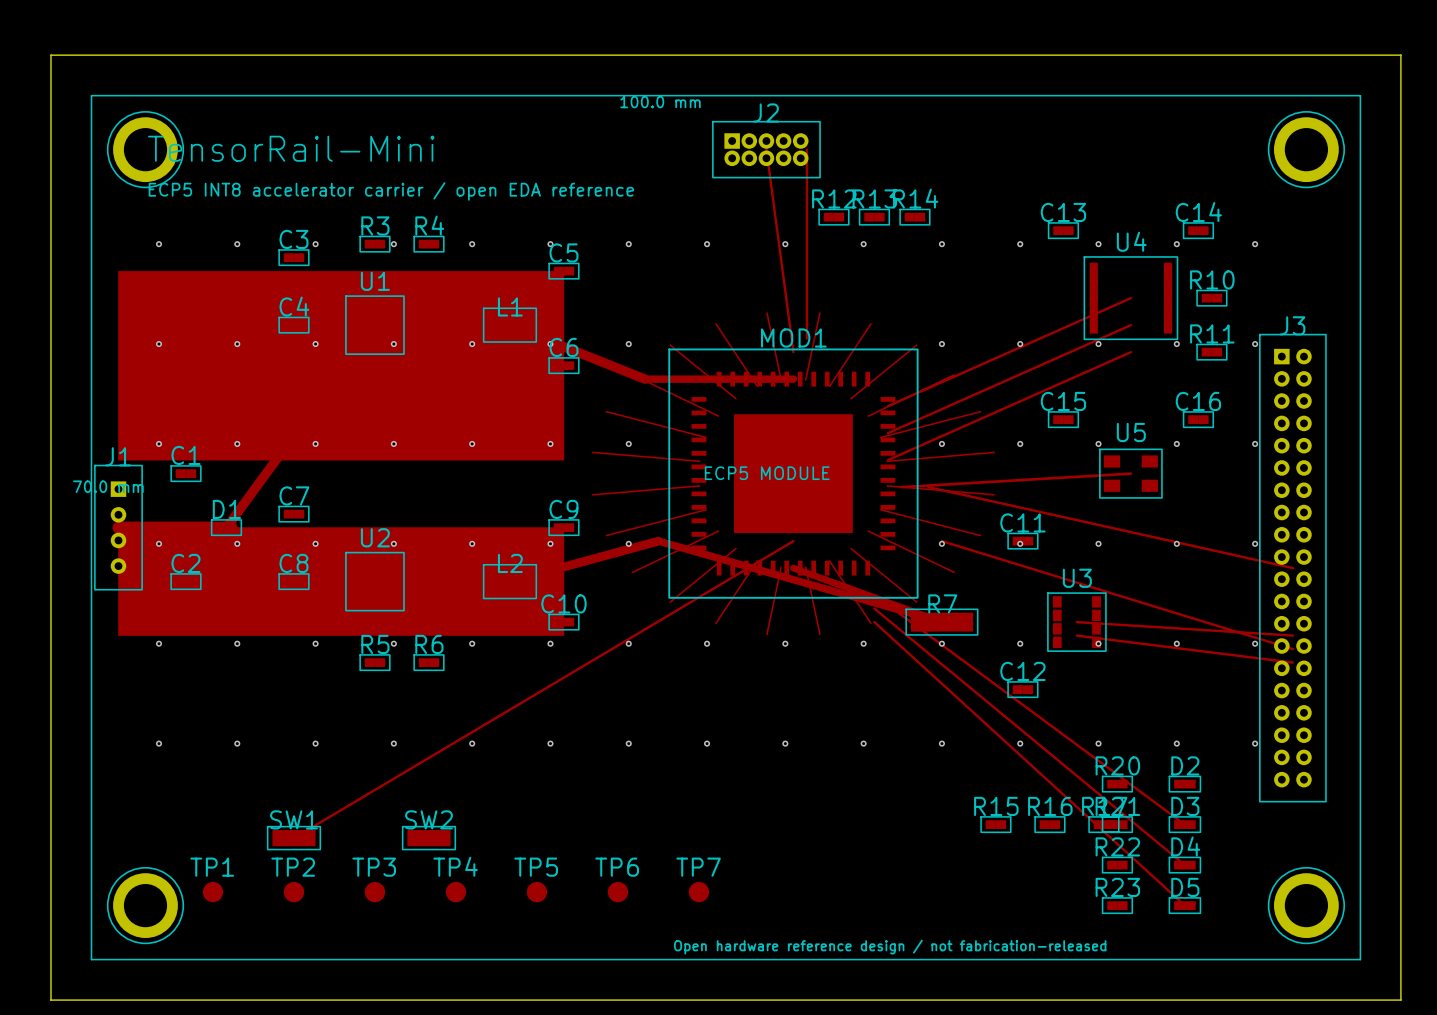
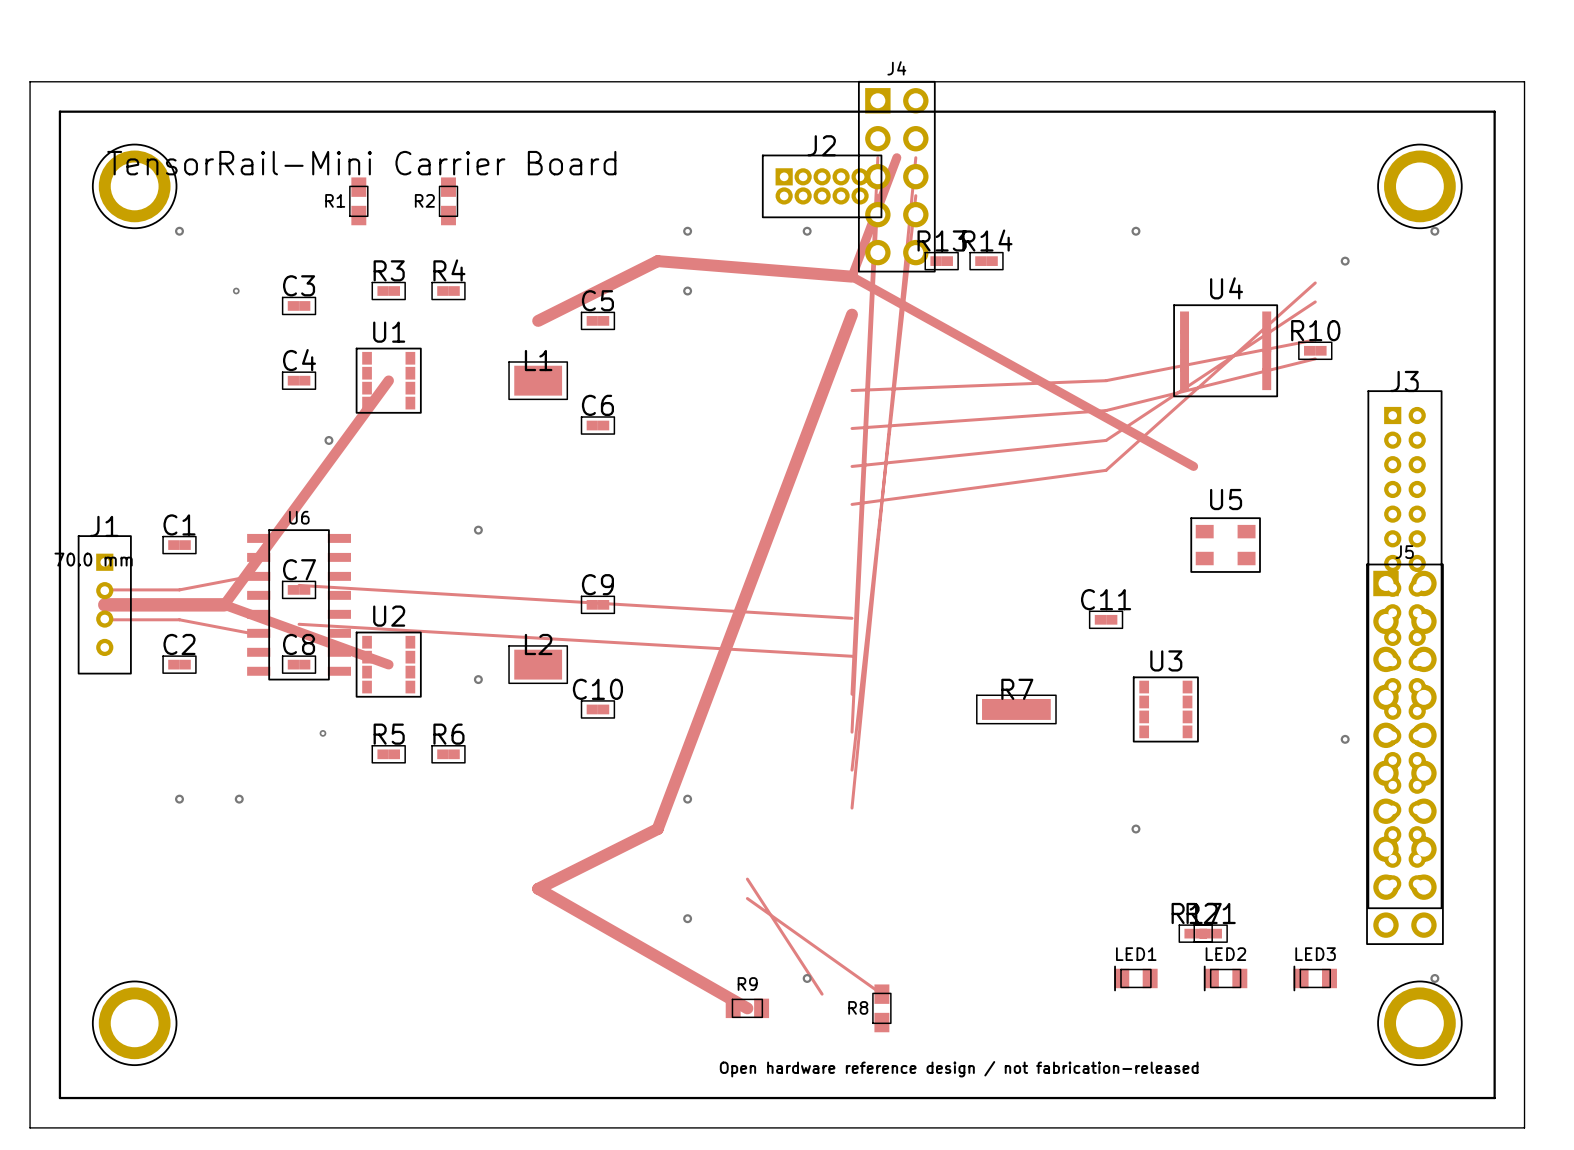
line: (91, 95) (1360, 95) (1360, 959) (91, 959) (91, 95) -> (59, 111) (59, 1098) (1494, 1098) (1494, 111) (59, 111)
text: 100.0 mm (660, 102) -> none
track: none -> (877, 157) (852, 694)
track: none -> (896, 157) (852, 276)
track: none -> (915, 157) (852, 808)
J4: none -> (896, 176)
text: TensorRail-Mini (291, 148) -> TensorRail-Mini Carrier Board (361, 163)
track: (766, 149) (793, 352) -> none
track: (806, 149) (806, 338) -> none
track: none -> (877, 195) (852, 732)
track: none -> (915, 195) (852, 770)
R1: none -> (358, 201)
R2: none -> (448, 201)
via: none -> (179, 231)
via: none -> (687, 231)
via: none -> (807, 231)
via: none -> (1135, 231)
via: none -> (1434, 231)
text: ECP5 INT8 accelerator carrier / open EDA reference (391, 191) -> none
R12: (833, 217) -> none
via: none -> (1345, 261)
C13: (1063, 230) -> none
C14: (1198, 230) -> none
track: none -> (852, 276) (657, 261) (538, 320)
track: none -> (852, 276) (1193, 466)
track: none -> (1315, 282) (1106, 470) (852, 504)
via: (158, 244) -> none
via: (315, 244) -> none
via: (393, 244) -> none
via: (472, 244) -> none
via: (550, 244) -> none
via: (628, 244) -> none
via: none -> (687, 291)
via: (707, 244) -> none
via: (785, 244) -> none
via: (863, 244) -> none
via: (941, 244) -> none
via: (1020, 244) -> none
via: (1098, 244) -> none
via: (1176, 244) -> none
via: (1255, 244) -> none
track: none -> (1315, 301) (1106, 440) (852, 466)
track: none -> (852, 314) (657, 829) (538, 888) (747, 1008)
drawing: [118, 270, 565, 461] -> none
track: none -> (1315, 339) (1106, 380) (852, 390)
track: (1130, 298) (887, 406) -> none
track: none -> (1315, 358) (1106, 410) (852, 428)
track: (766, 312) (781, 379) -> none
track: (819, 312) (805, 379) -> none
track: (715, 323) (757, 386) -> none
track: (870, 323) (829, 386) -> none
track: (395, 325) (509, 325) (644, 379) (793, 379) -> none
track: (1130, 325) (887, 433) -> none
via: (158, 344) -> none
via: (237, 344) -> none
via: (315, 344) -> none
via: (393, 344) -> none
via: (472, 344) -> none
via: (550, 344) -> none
via: (628, 344) -> none
via: (941, 344) -> none
via: (1020, 344) -> none
via: (1098, 344) -> none
via: (1176, 344) -> none
via: (1255, 344) -> none
track: (670, 345) (735, 398) -> none
track: (916, 345) (850, 398) -> none
track: (1130, 352) (887, 460) -> none
R11: (1211, 352) -> none
track: (632, 374) (718, 416) -> none
track: (954, 374) (868, 416) -> none
via: none -> (328, 440)
track: (606, 411) (706, 437) -> none
track: (980, 411) (880, 437) -> none
C15: (1063, 419) -> none
C16: (1198, 419) -> none
via: (158, 443) -> none
via: (237, 443) -> none
via: (315, 443) -> none
via: (393, 443) -> none
via: (472, 443) -> none
via: (550, 443) -> none
via: (628, 443) -> none
via: (941, 443) -> none
via: (1020, 443) -> none
via: (1098, 443) -> none
via: (1176, 443) -> none
via: (1255, 443) -> none
track: (592, 452) (699, 461) -> none
track: (994, 452) (887, 461) -> none
via: none -> (478, 530)
MOD1: (793, 473) -> none
track: (1130, 473) (901, 487) -> none
track: (699, 485) (592, 494) -> none
track: (887, 485) (994, 494) -> none
track: (928, 487) (1292, 568) -> none
track: none -> (257, 574) (179, 589) (104, 589)
track: (706, 509) (606, 535) -> none
track: (880, 509) (980, 535) -> none
track: none -> (299, 585) (852, 618)
drawing: [118, 527, 565, 636] -> none
D1: (226, 527) -> none
U6: none -> (299, 604)
track: (718, 531) (632, 572) -> none
track: (868, 531) (954, 572) -> none
track: none -> (104, 619) (179, 619) (257, 634)
track: (793, 541) (293, 838) -> none
track: (941, 541) (1292, 649) -> none
via: (158, 543) -> none
via: (237, 543) -> none
via: (315, 543) -> none
via: (393, 543) -> none
via: (472, 543) -> none
via: (550, 543) -> none
via: (628, 543) -> none
via: (941, 543) -> none
via: (1020, 543) -> none
via: (1098, 543) -> none
via: (1176, 543) -> none
via: (1255, 543) -> none
track: none -> (299, 624) (852, 656)
track: (735, 548) (670, 602) -> none
track: (850, 548) (916, 602) -> none
track: (757, 560) (715, 623) -> none
track: (829, 560) (870, 623) -> none
track: (781, 567) (766, 634) -> none
track: (805, 567) (819, 634) -> none
track: (793, 568) (941, 622) (658, 541) (509, 581) (395, 581) -> none
via: none -> (478, 679)
track: (874, 595) (1184, 824) -> none
track: (874, 608) (1184, 865) -> none
track: (874, 622) (1184, 905) -> none
track: (1076, 622) (1292, 635) -> none
track: (1076, 635) (1292, 662) -> none
via: (158, 643) -> none
via: (237, 643) -> none
via: (393, 643) -> none
via: (472, 643) -> none
via: (550, 643) -> none
via: (628, 643) -> none
via: (707, 643) -> none
via: (785, 643) -> none
via: (863, 643) -> none
via: (941, 643) -> none
via: (1020, 643) -> none
via: (1098, 643) -> none
via: (1176, 643) -> none
via: (1255, 643) -> none
via: none -> (1345, 739)
J5: none -> (1404, 754)
C12: (1022, 689) -> none
via: none -> (179, 799)
via: none -> (239, 799)
via: none -> (687, 799)
via: none -> (1135, 829)
via: (158, 743) -> none
via: (237, 743) -> none
via: (315, 743) -> none
via: (393, 743) -> none
via: (472, 743) -> none
via: (550, 743) -> none
via: (628, 743) -> none
via: (707, 743) -> none
via: (785, 743) -> none
via: (863, 743) -> none
via: (941, 743) -> none
via: (1020, 743) -> none
via: (1098, 743) -> none
via: (1176, 743) -> none
via: (1255, 743) -> none
track: none -> (747, 879) (822, 994)
R20: (1117, 784) -> none
D2: (1184, 784) -> none
track: none -> (747, 898) (881, 994)
via: none -> (687, 918)
R15: (995, 824) -> none
R16: (1049, 824) -> none
D3: (1184, 824) -> none
SW1: (293, 838) -> none
SW2: (428, 838) -> none
via: none -> (807, 978)
LED1: none -> (1135, 978)
R22: (1117, 865) -> none
LED2: none -> (1225, 978)
D4: (1184, 865) -> none
LED3: none -> (1315, 978)
via: none -> (1434, 978)
TP1: (212, 892) -> none
TP2: (293, 892) -> none
TP3: (374, 892) -> none
TP4: (455, 892) -> none
TP5: (536, 892) -> none
TP6: (617, 892) -> none
TP7: (698, 892) -> none
R9: none -> (747, 1008)
R8: none -> (881, 1008)
R23: (1117, 905) -> none
D5: (1184, 905) -> none

